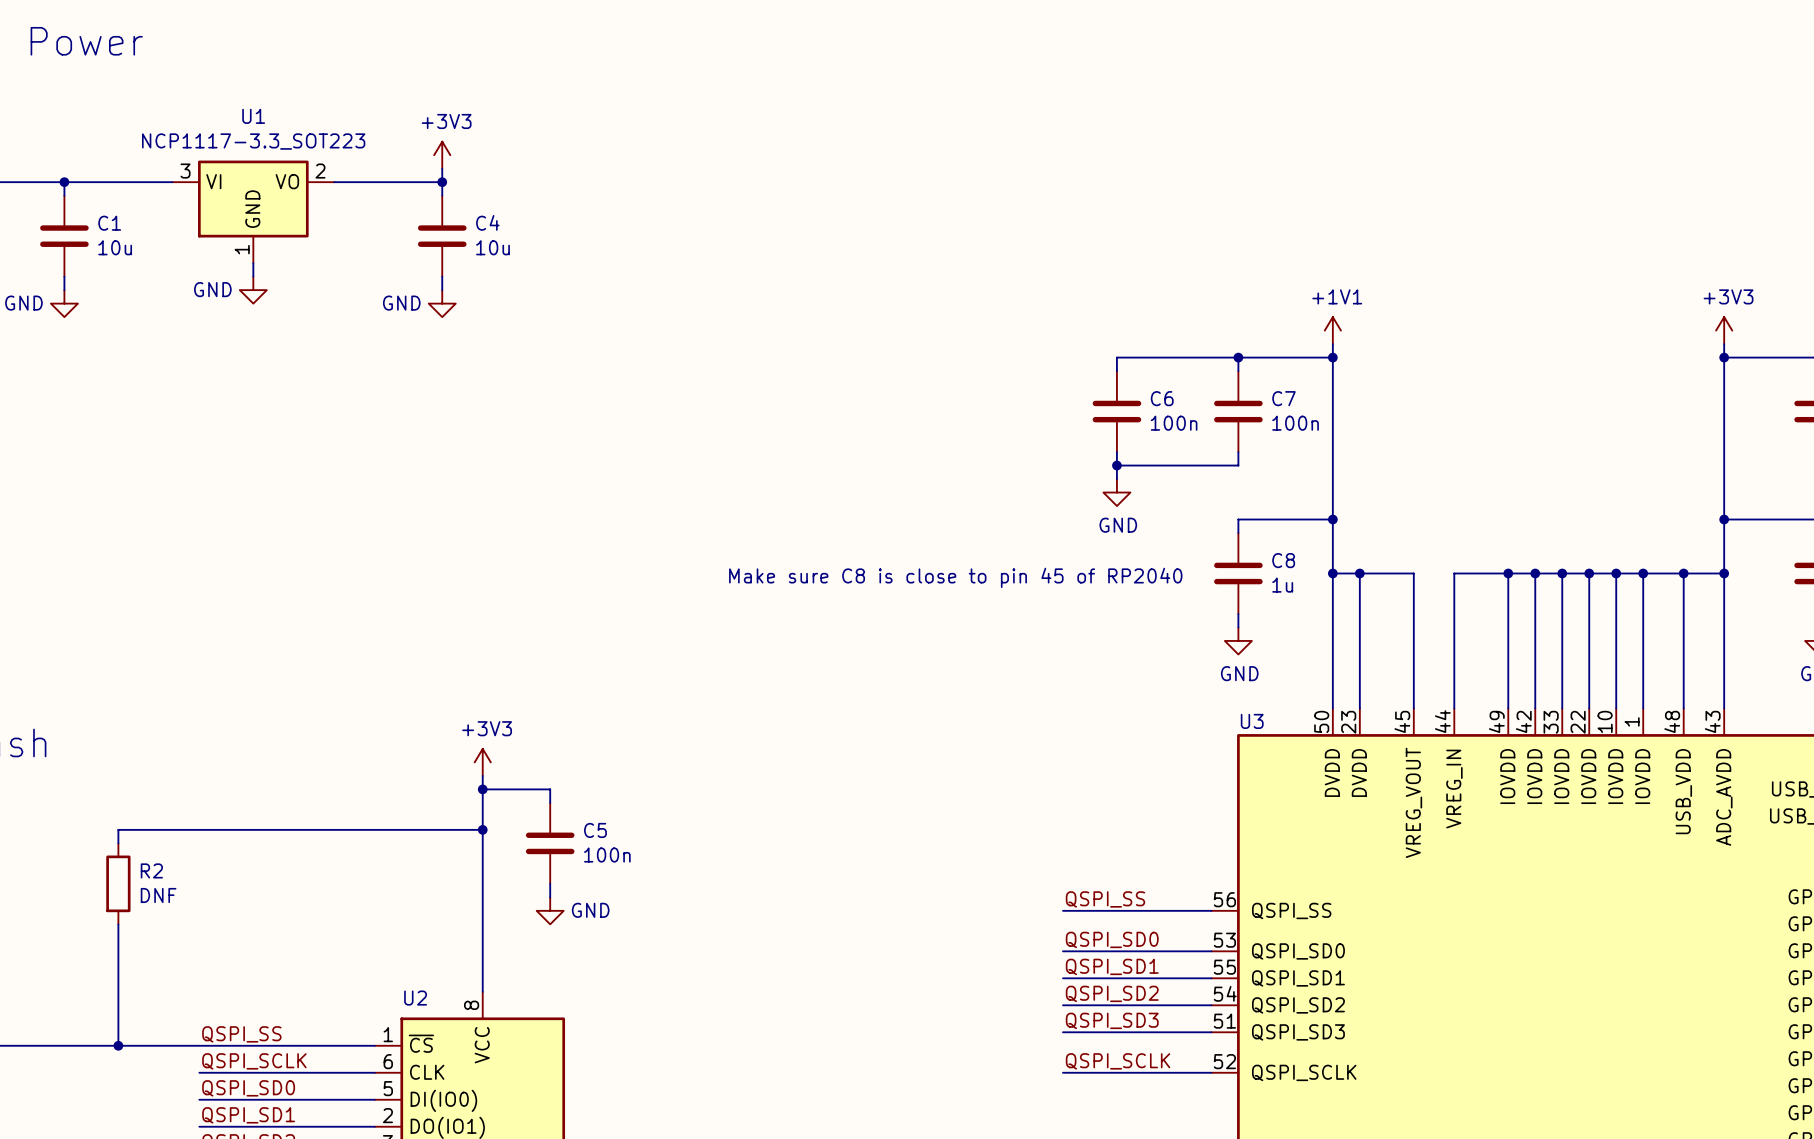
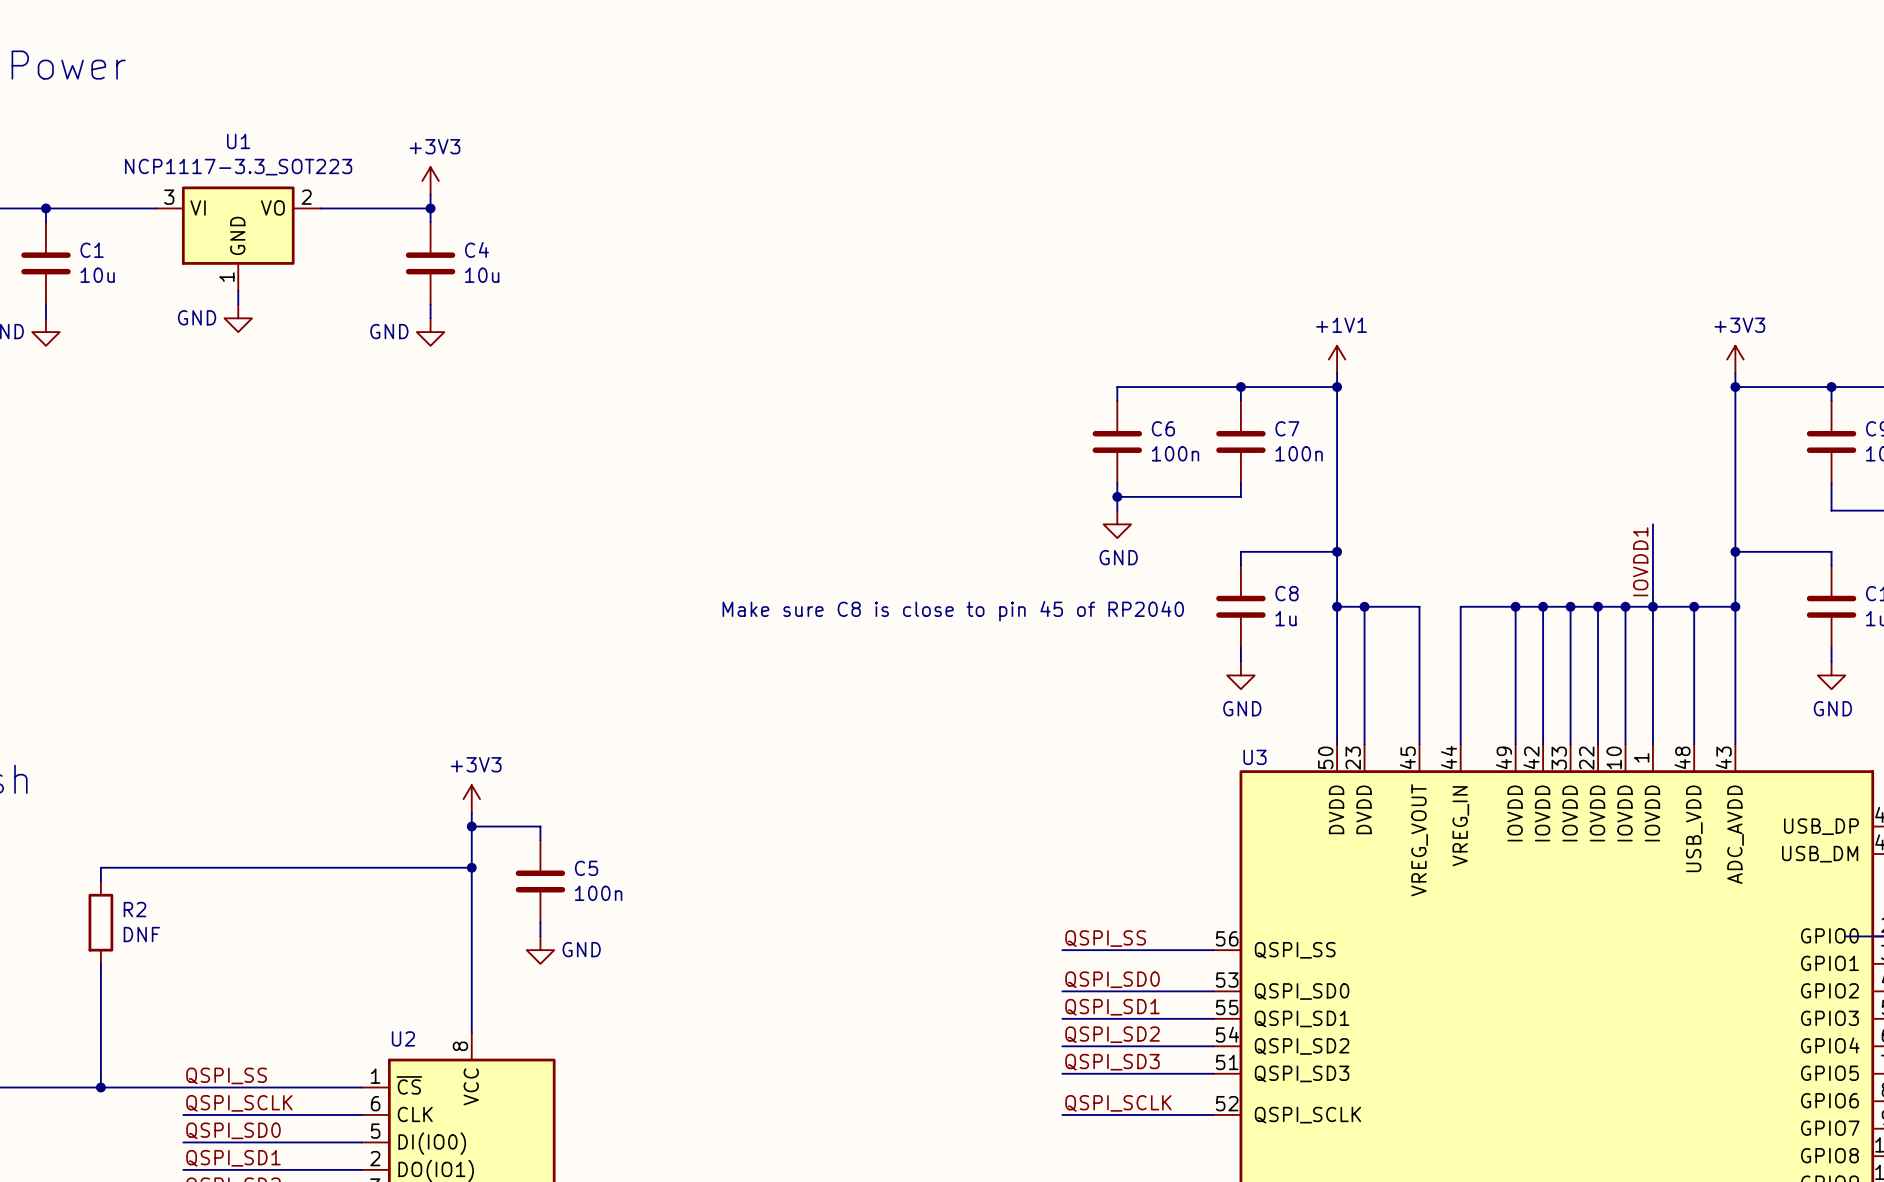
wire: none -> (1652, 524) (1652, 606)
label: none -> IOVDD1 (1640, 561)

